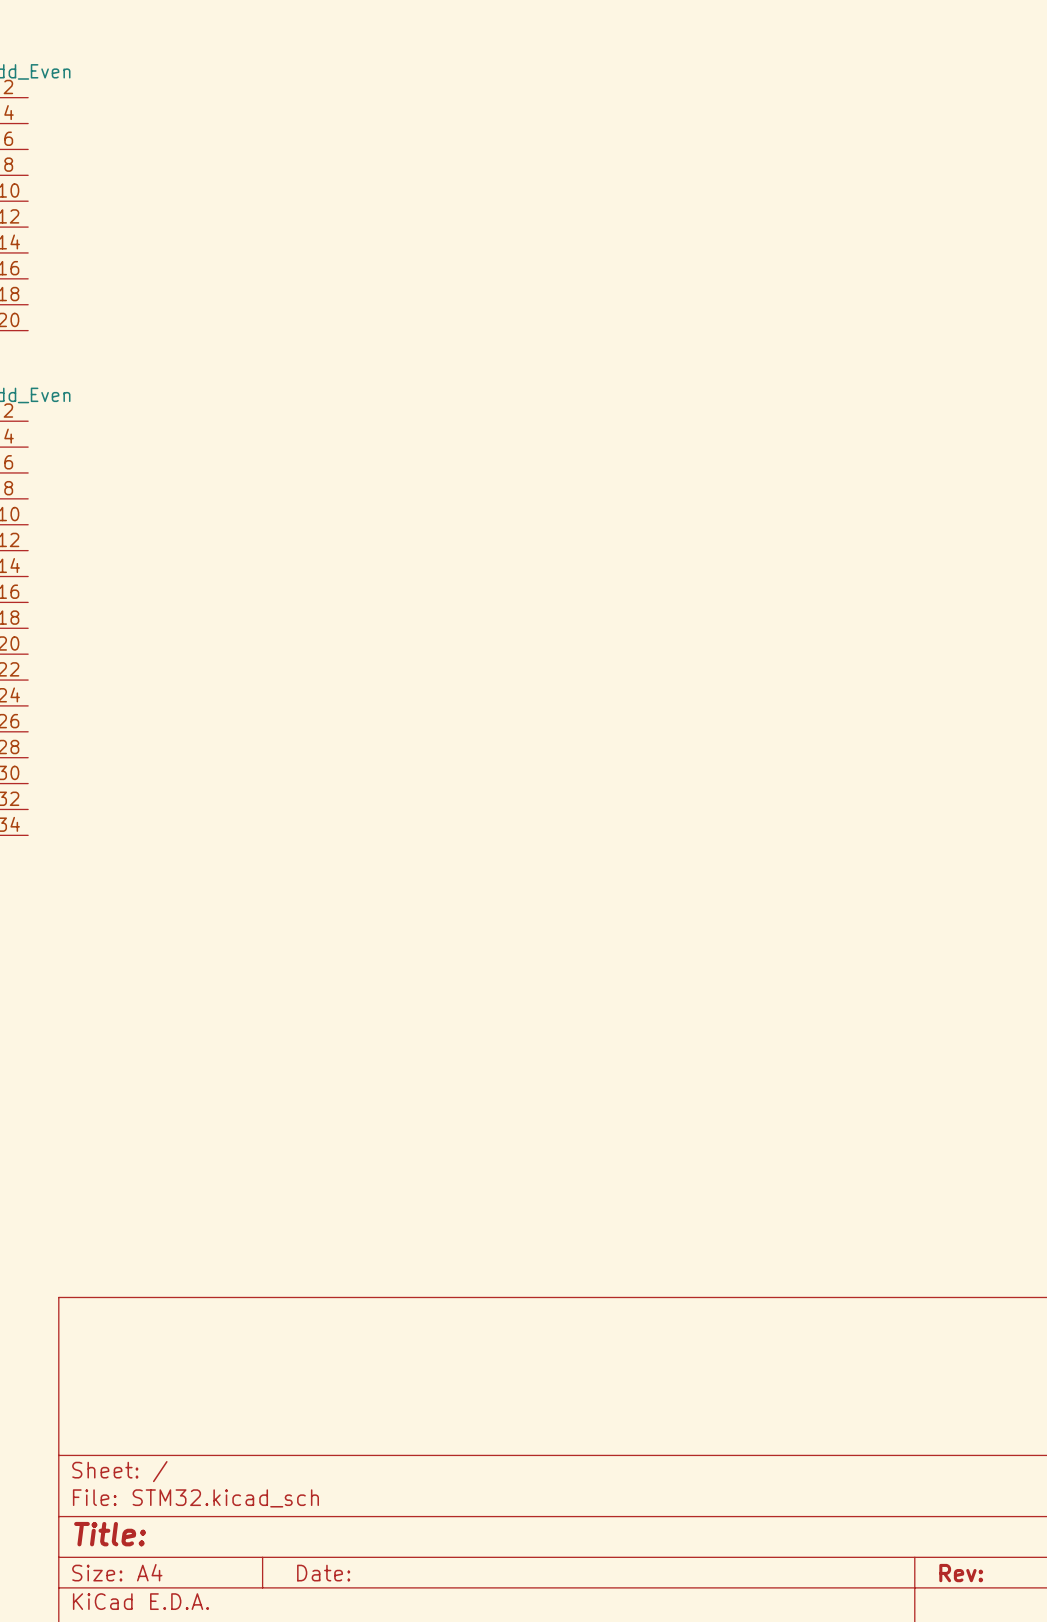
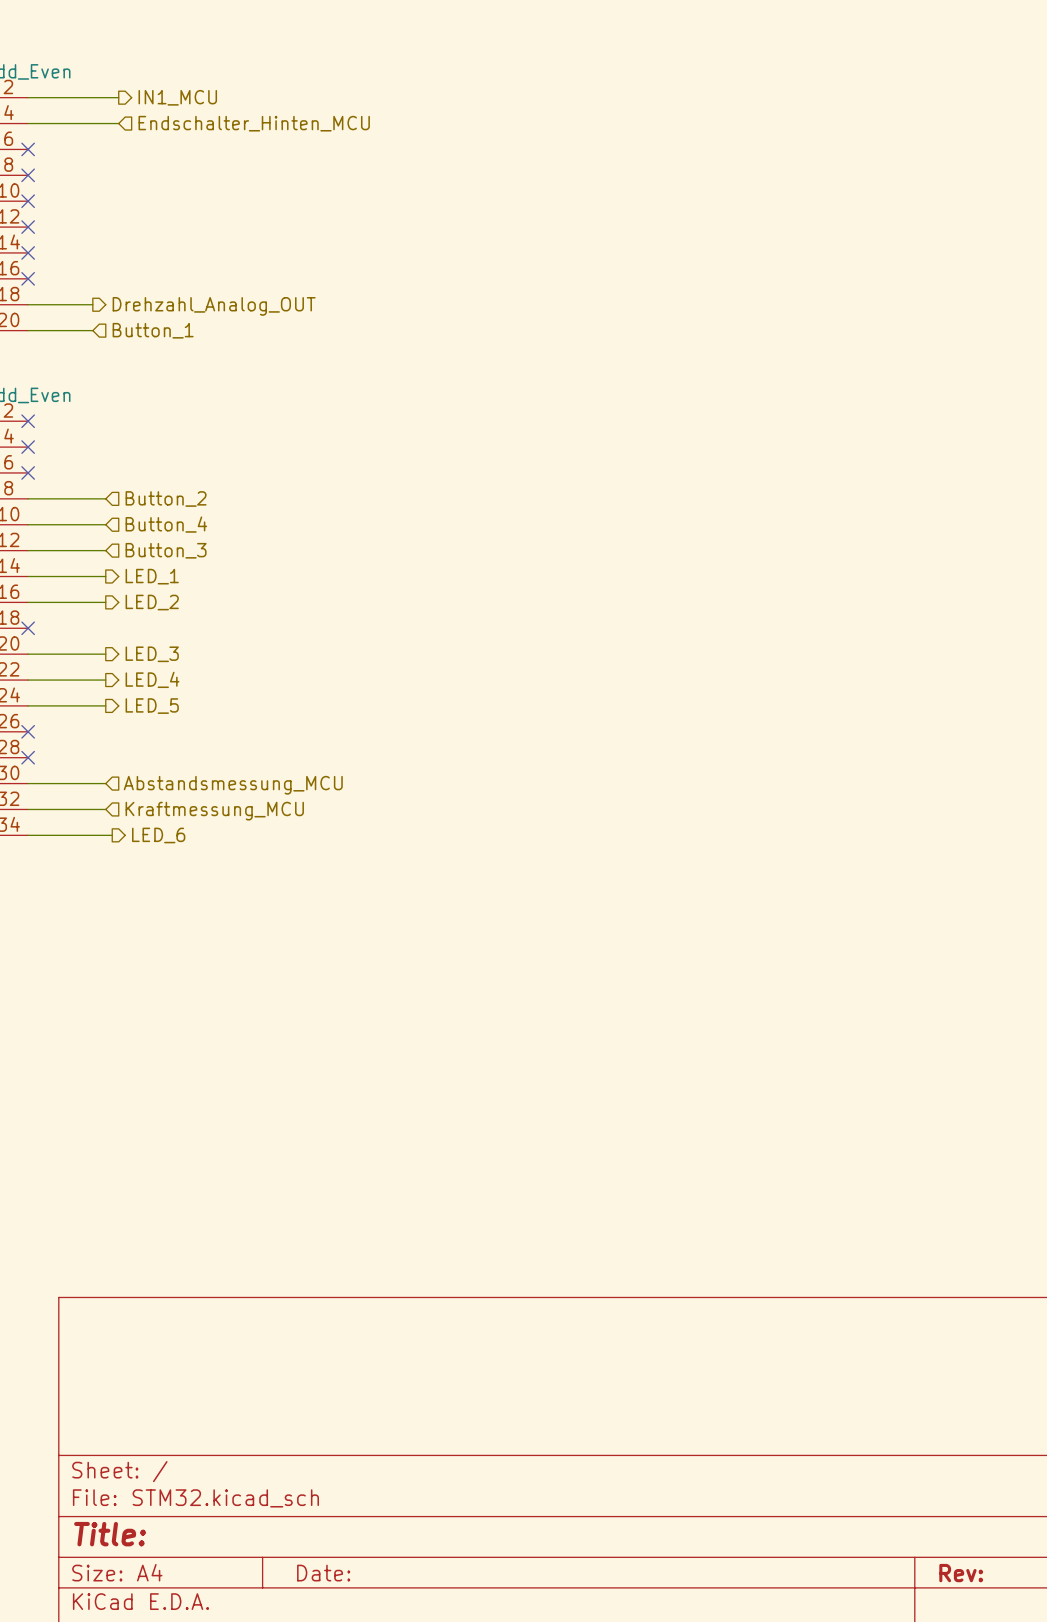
wire: none -> (28, 97) (118, 97)
hierarchical label: none -> IN1_MCU (177, 97)
wire: none -> (28, 123) (118, 123)
hierarchical label: none -> Endschalter_Hinten_MCU (254, 123)
no-connect mark: none -> (28, 149)
no-connect mark: none -> (28, 175)
no-connect mark: none -> (28, 201)
no-connect mark: none -> (28, 227)
no-connect mark: none -> (28, 252)
no-connect mark: none -> (28, 278)
wire: none -> (28, 304) (92, 304)
hierarchical label: none -> Drehzahl_Analog_OUT (214, 306)
wire: none -> (28, 330) (92, 330)
hierarchical label: none -> Button_1 (153, 330)
no-connect mark: none -> (28, 421)
no-connect mark: none -> (28, 447)
no-connect mark: none -> (28, 472)
wire: none -> (28, 498) (105, 498)
hierarchical label: none -> Button_2 (166, 498)
wire: none -> (28, 524) (105, 524)
hierarchical label: none -> Button_4 (166, 524)
wire: none -> (28, 550) (105, 550)
hierarchical label: none -> Button_3 (166, 550)
wire: none -> (28, 576) (105, 576)
hierarchical label: none -> LED_1 (152, 576)
wire: none -> (28, 602) (105, 602)
hierarchical label: none -> LED_2 (152, 602)
no-connect mark: none -> (28, 628)
wire: none -> (28, 654) (105, 654)
hierarchical label: none -> LED_3 (152, 654)
hierarchical label: none -> LED_4 (152, 679)
wire: none -> (28, 680) (105, 680)
wire: none -> (28, 705) (105, 705)
hierarchical label: none -> LED_5 (152, 706)
no-connect mark: none -> (28, 731)
no-connect mark: none -> (28, 757)
wire: none -> (28, 783) (105, 783)
hierarchical label: none -> Abstandsmessung_MCU (233, 785)
wire: none -> (28, 809) (105, 809)
hierarchical label: none -> Kraftmessung_MCU (214, 811)
wire: none -> (28, 835) (112, 835)
hierarchical label: none -> LED_6 (158, 835)

